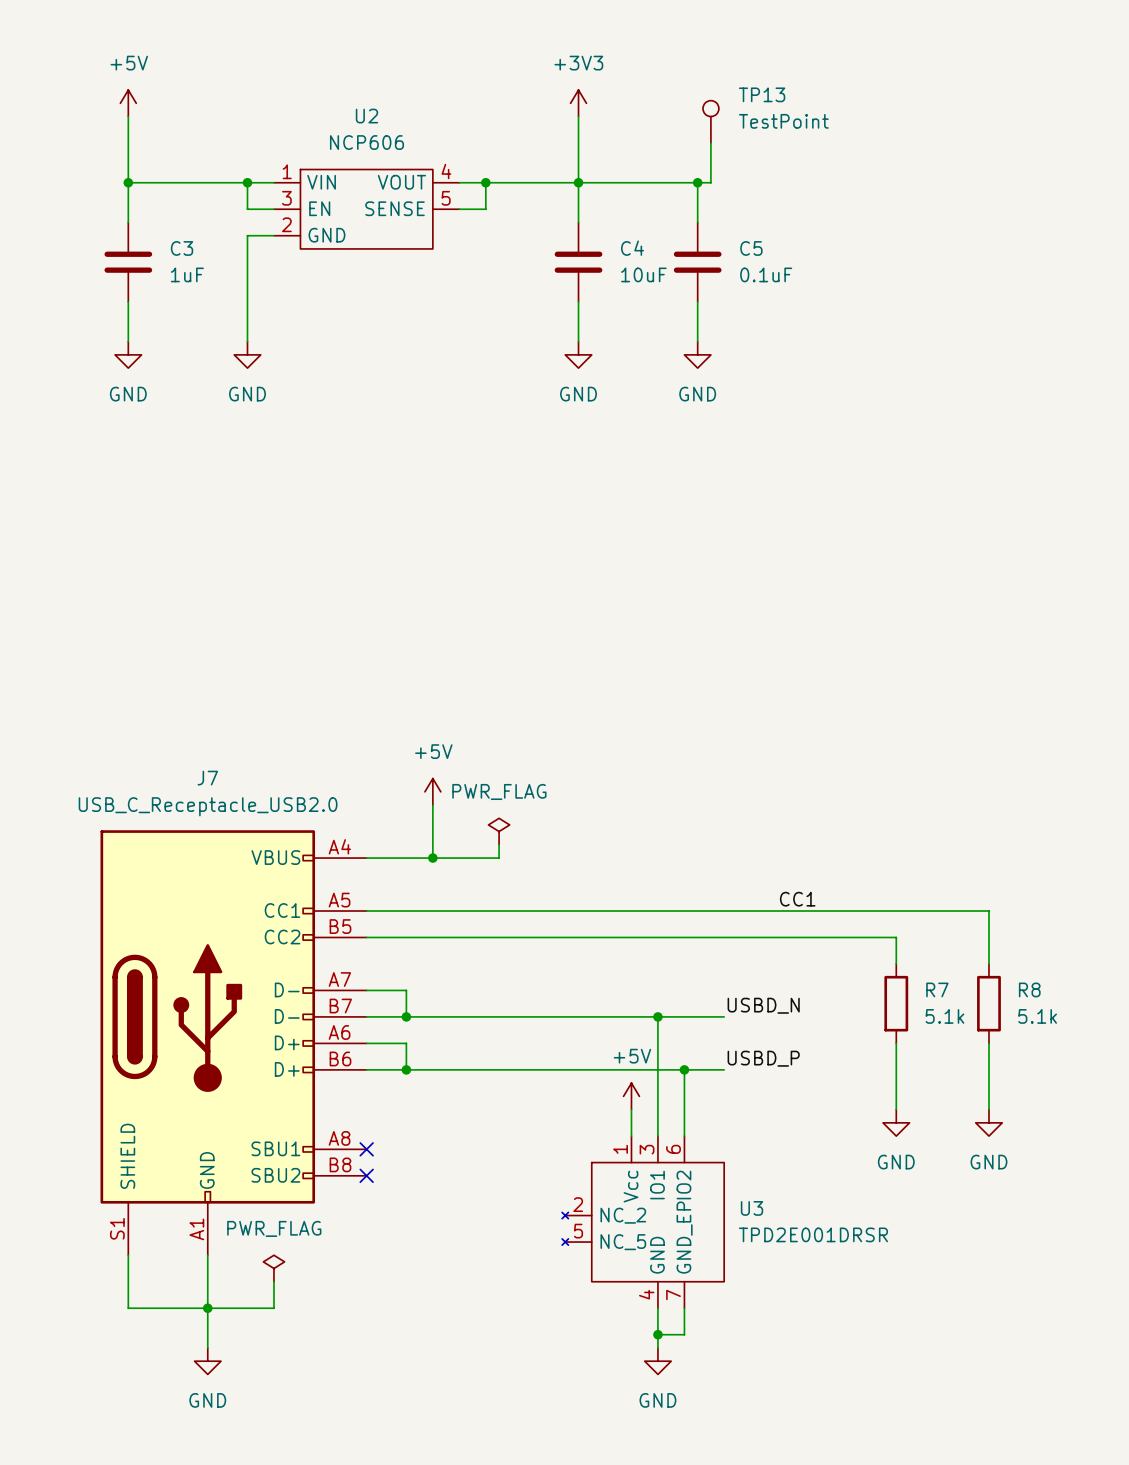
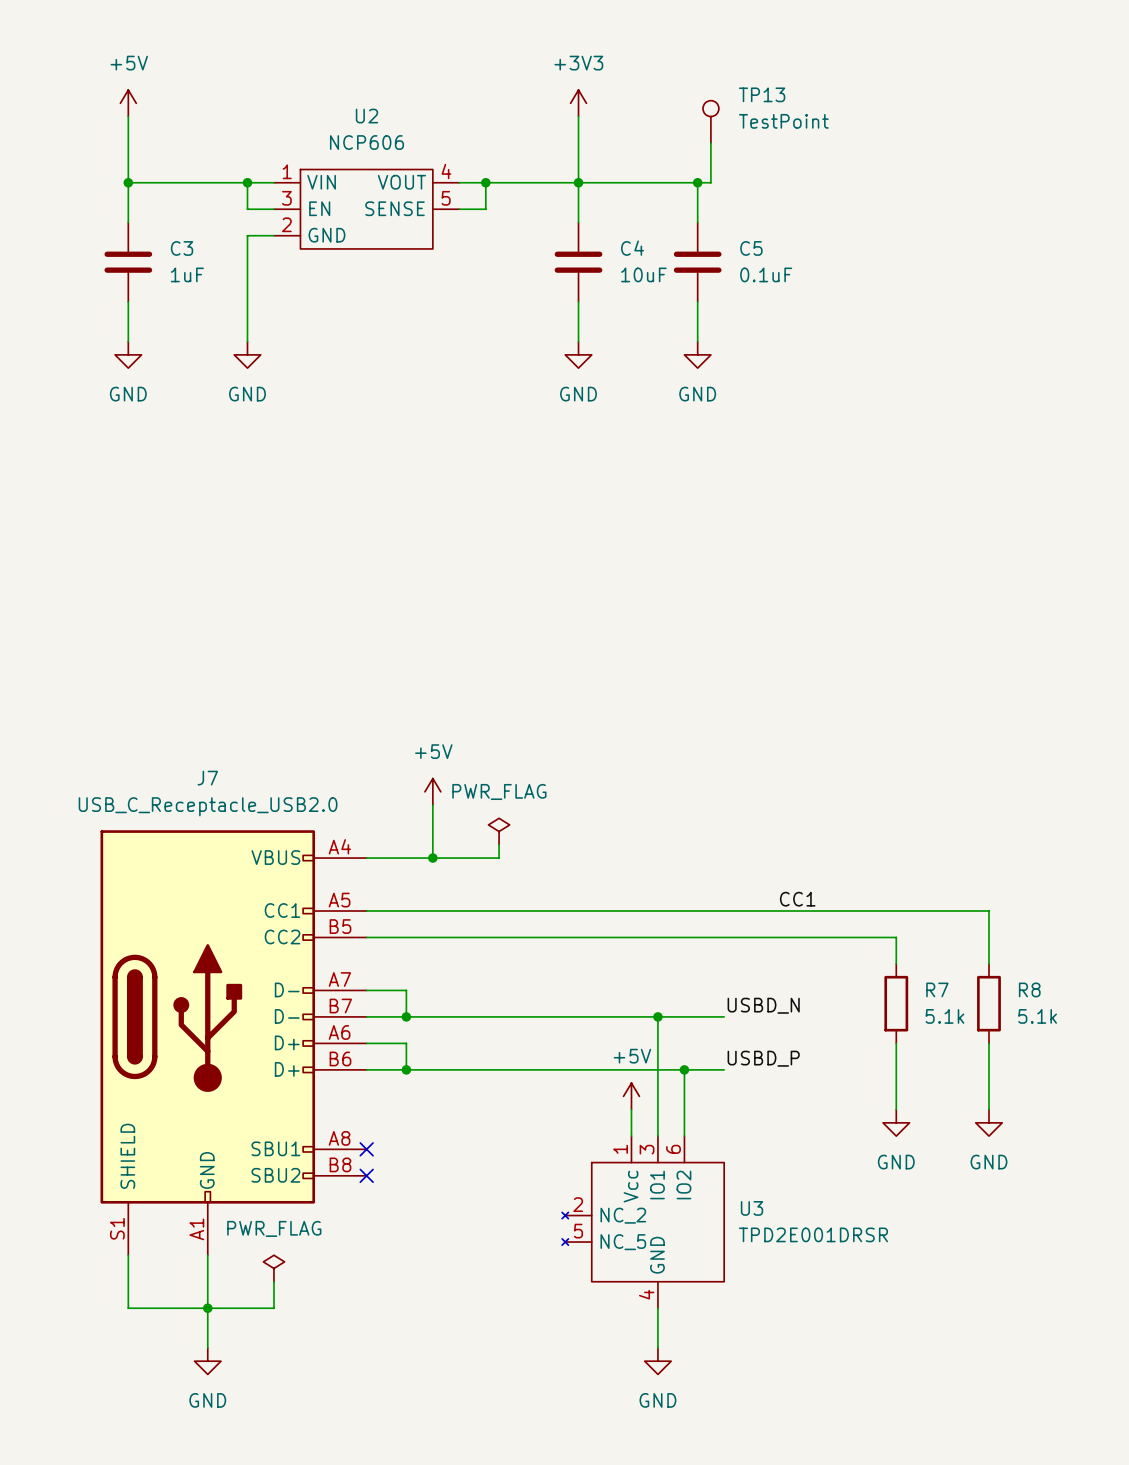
U3 symbol: [562, 1136, 725, 1309] -> [562, 1136, 725, 1309]
wire: (684, 1308) (684, 1334) (657, 1334) -> none
junction: (657, 1334) -> none

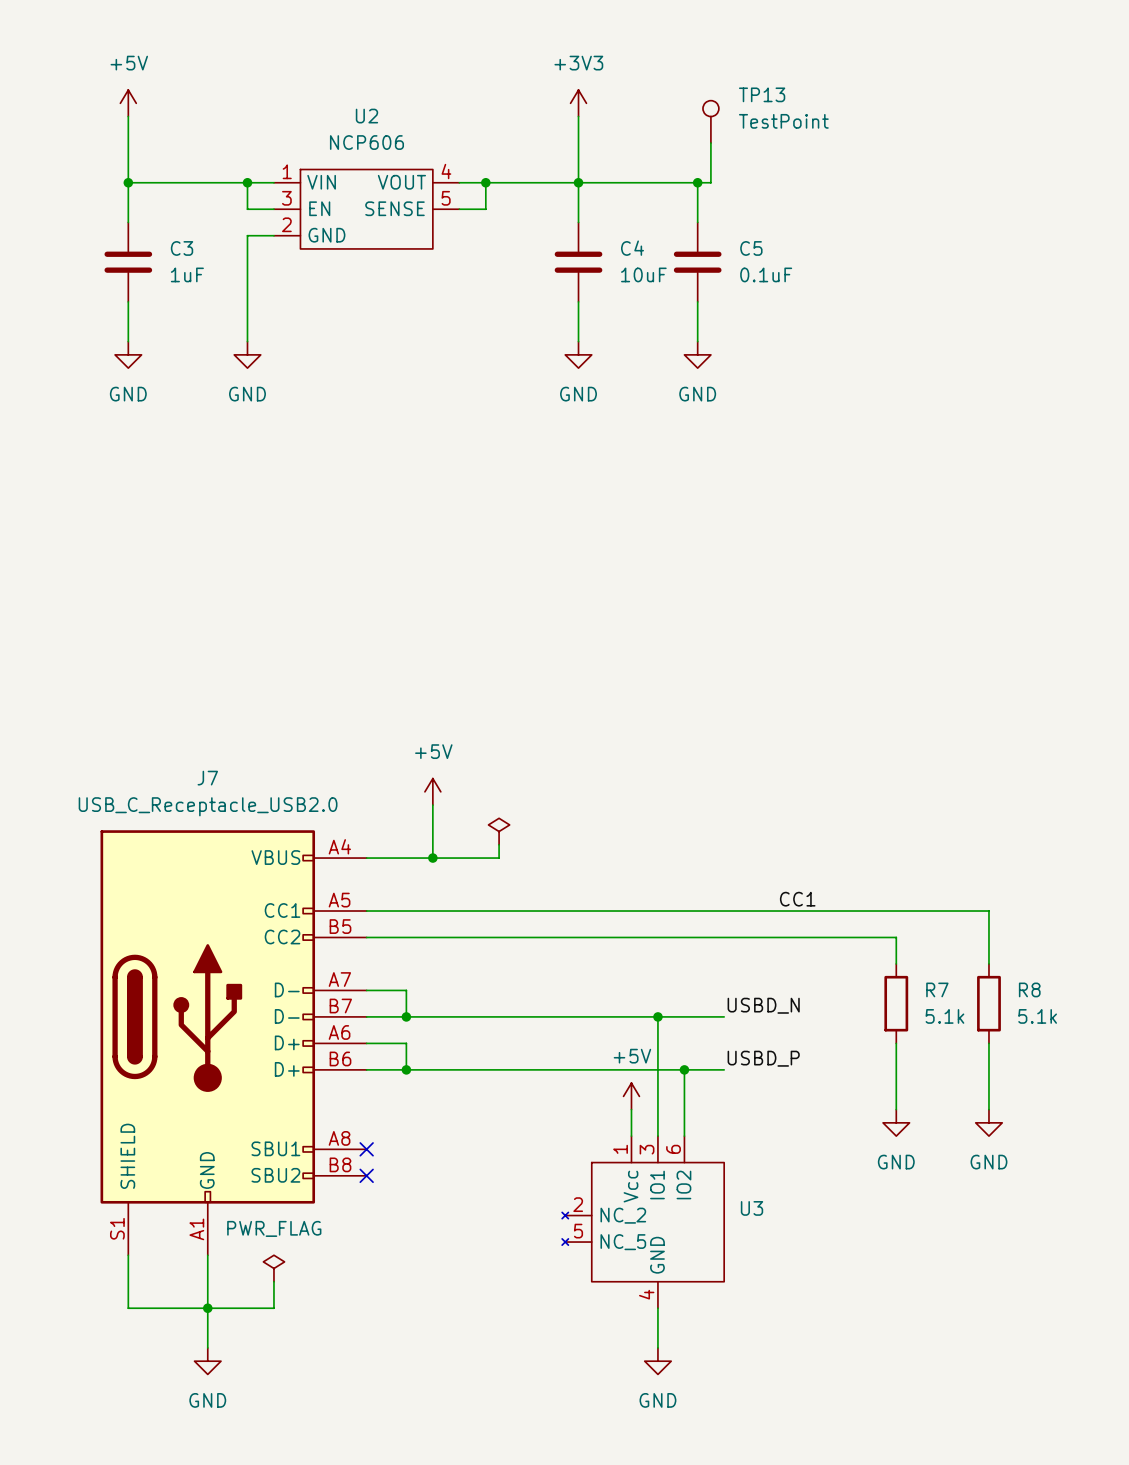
power symbol text: PWR_FLAG (499, 791) -> none
U3 value: TPD2E001DRSR (813, 1234) -> none

